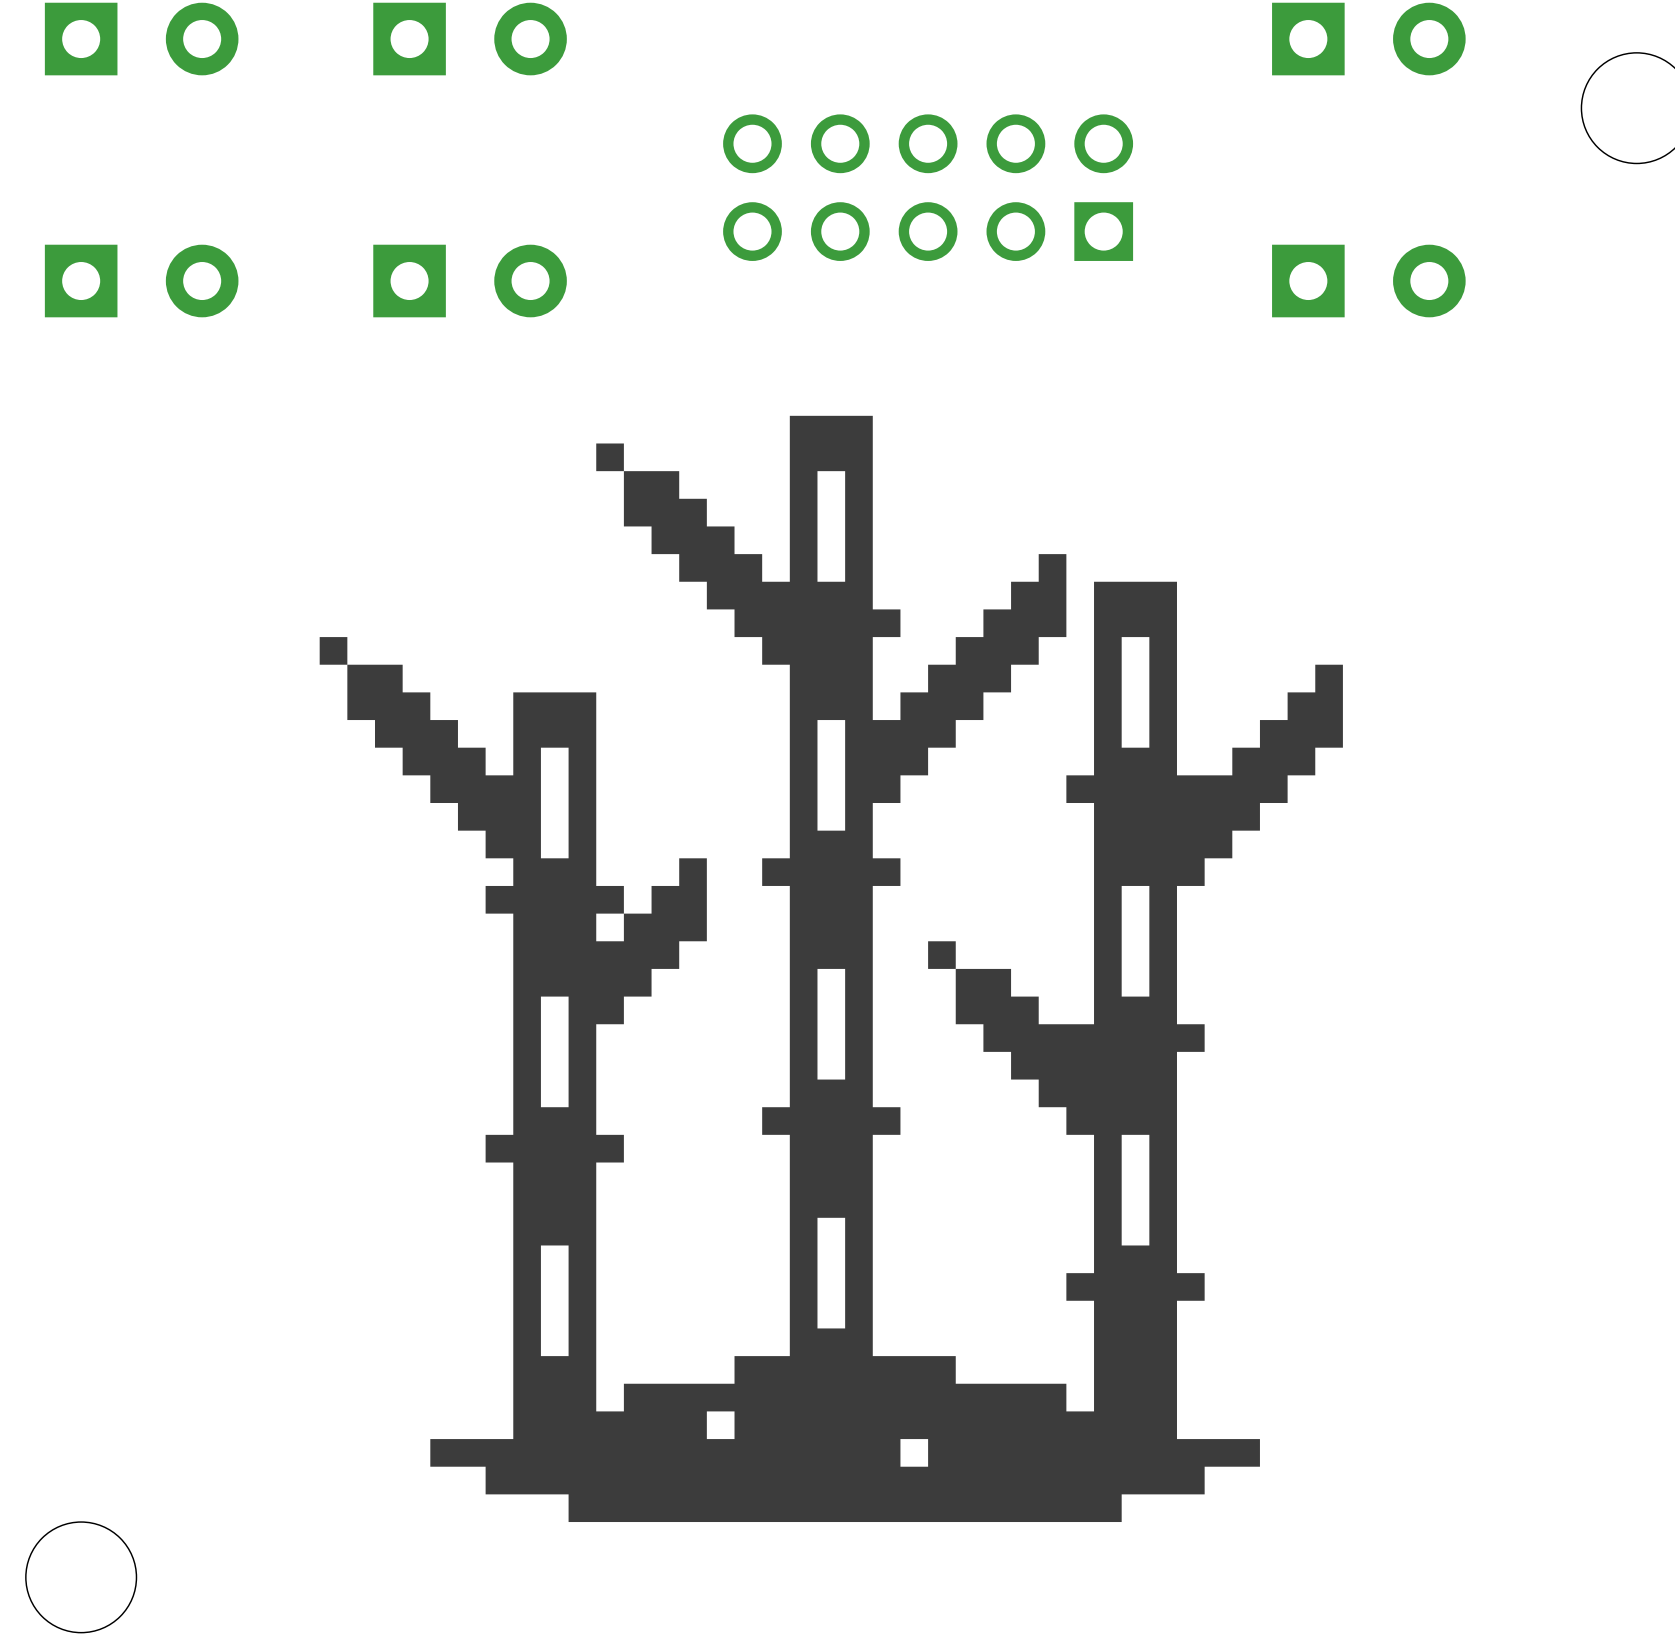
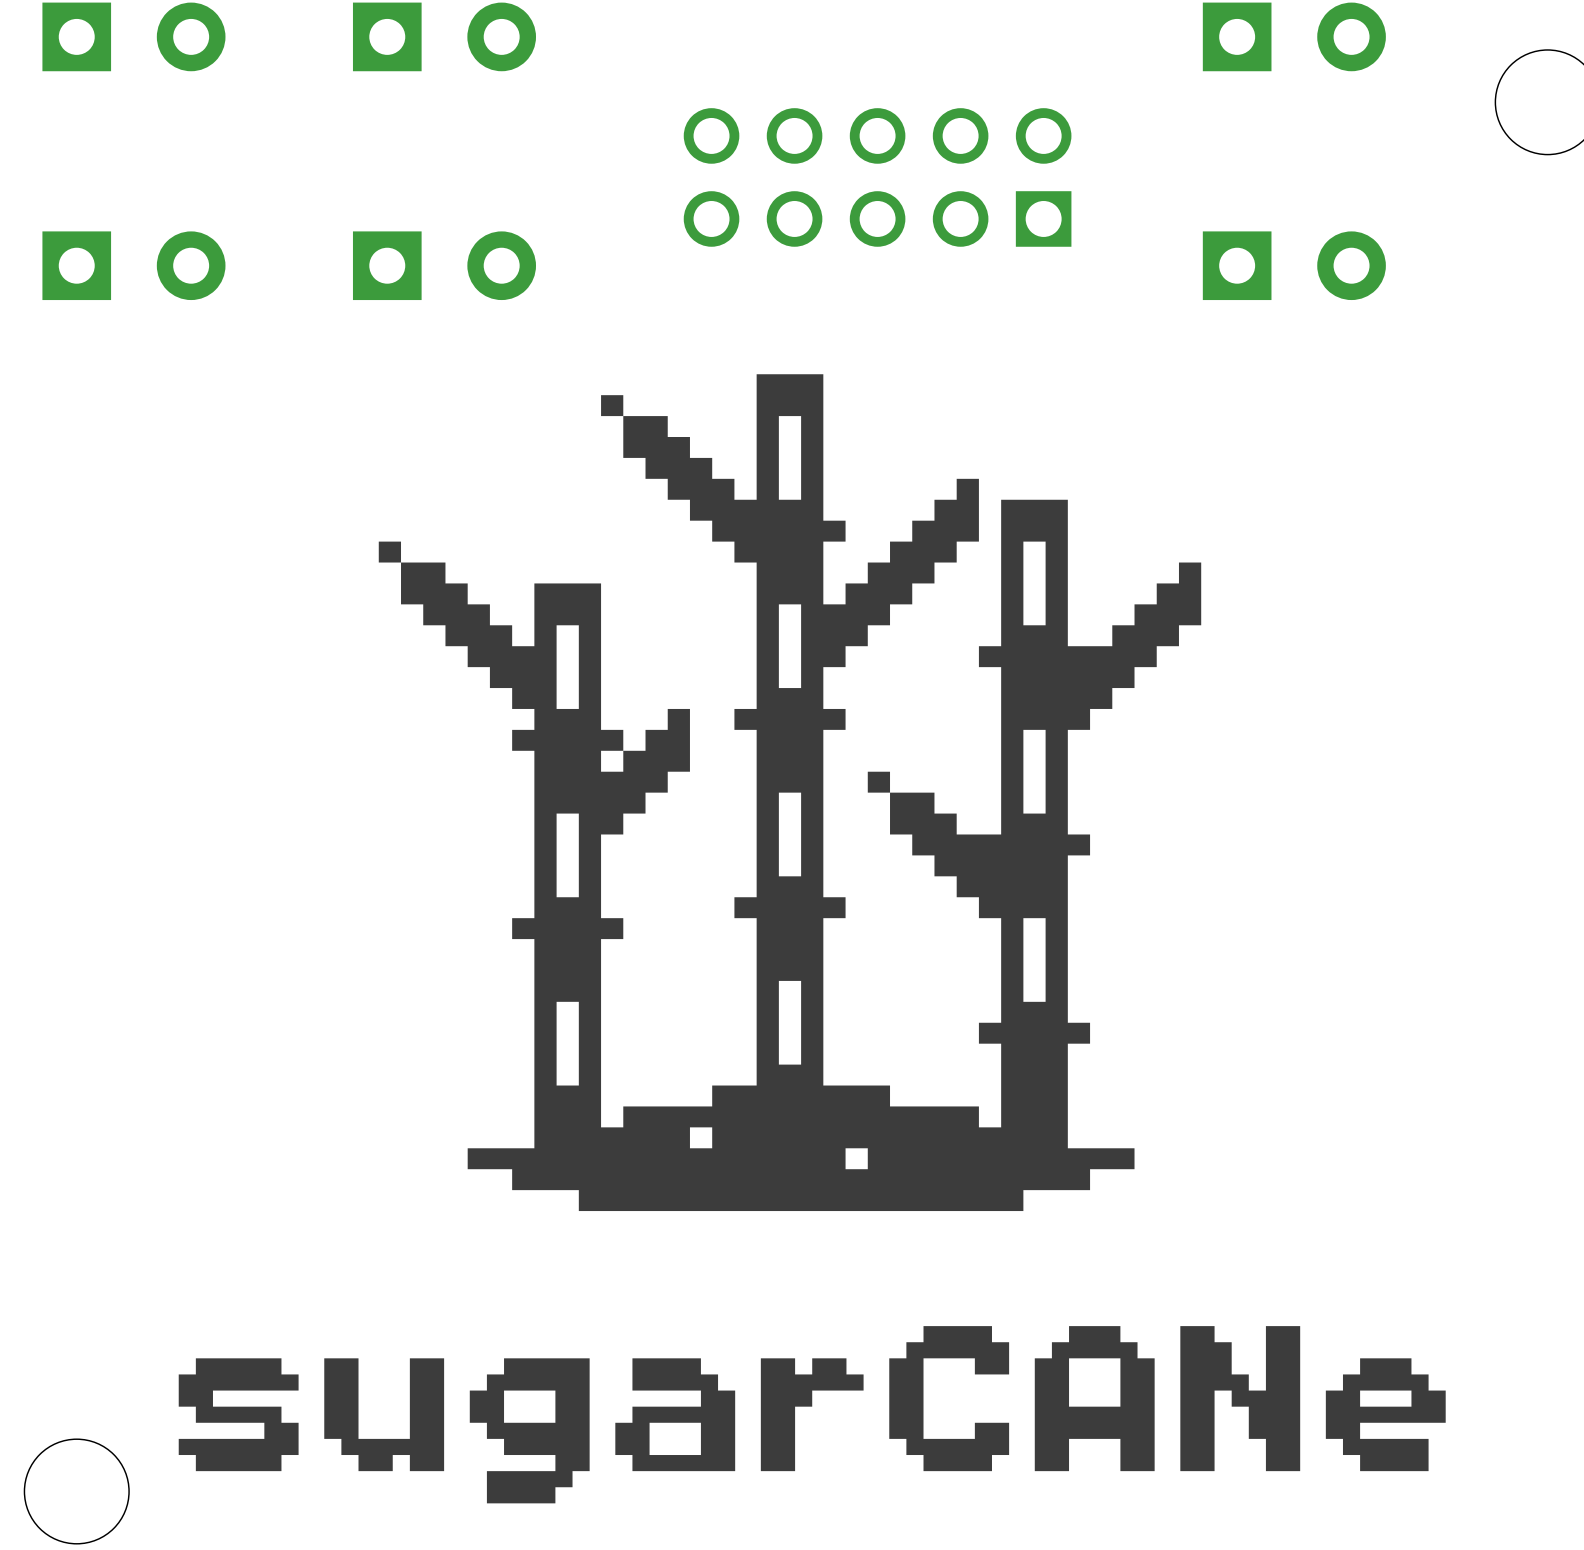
drawing: none -> [378, 374, 1202, 1212]
drawing: [319, 415, 1343, 1523] -> none
drawing: none -> [178, 1326, 1446, 1504]

